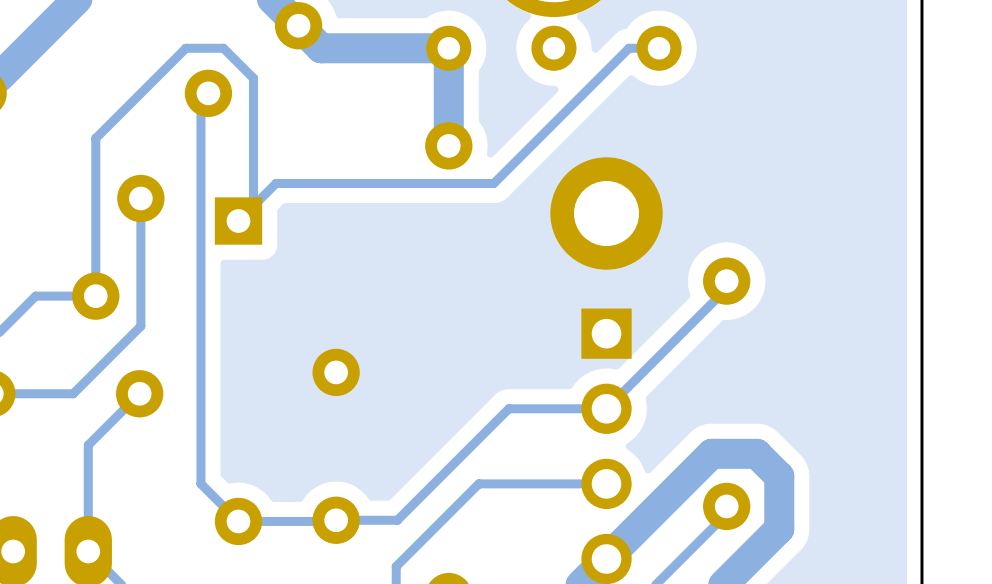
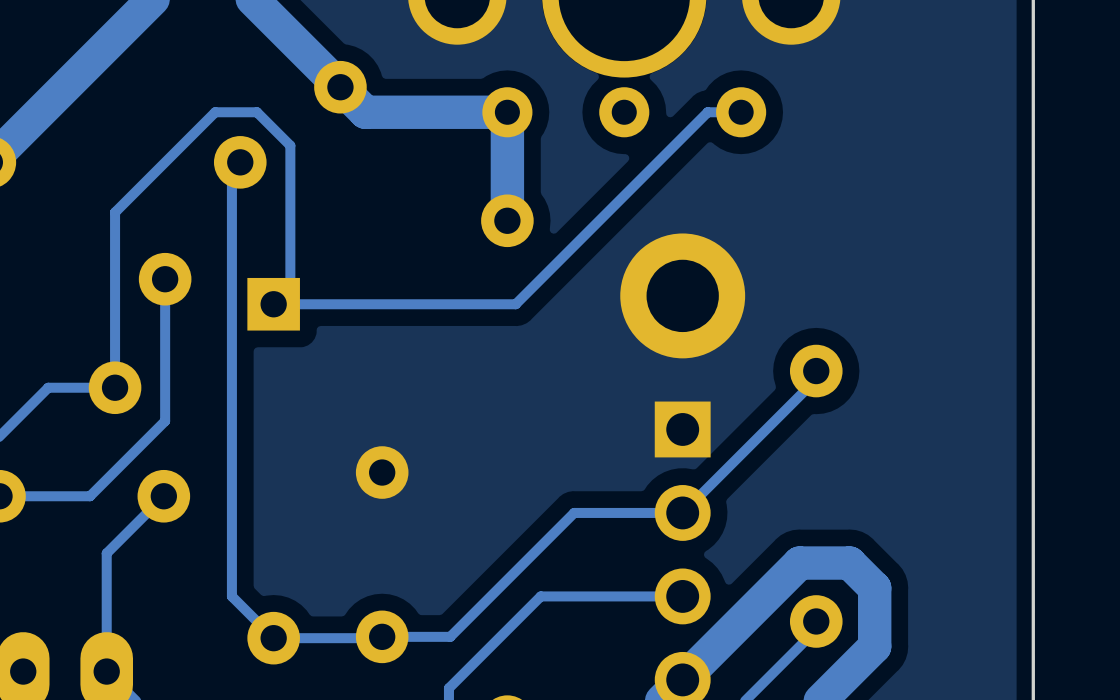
track: (493, 183) (276, 183) (253, 205) -> (557, 262) (515, 304) (273, 304)

